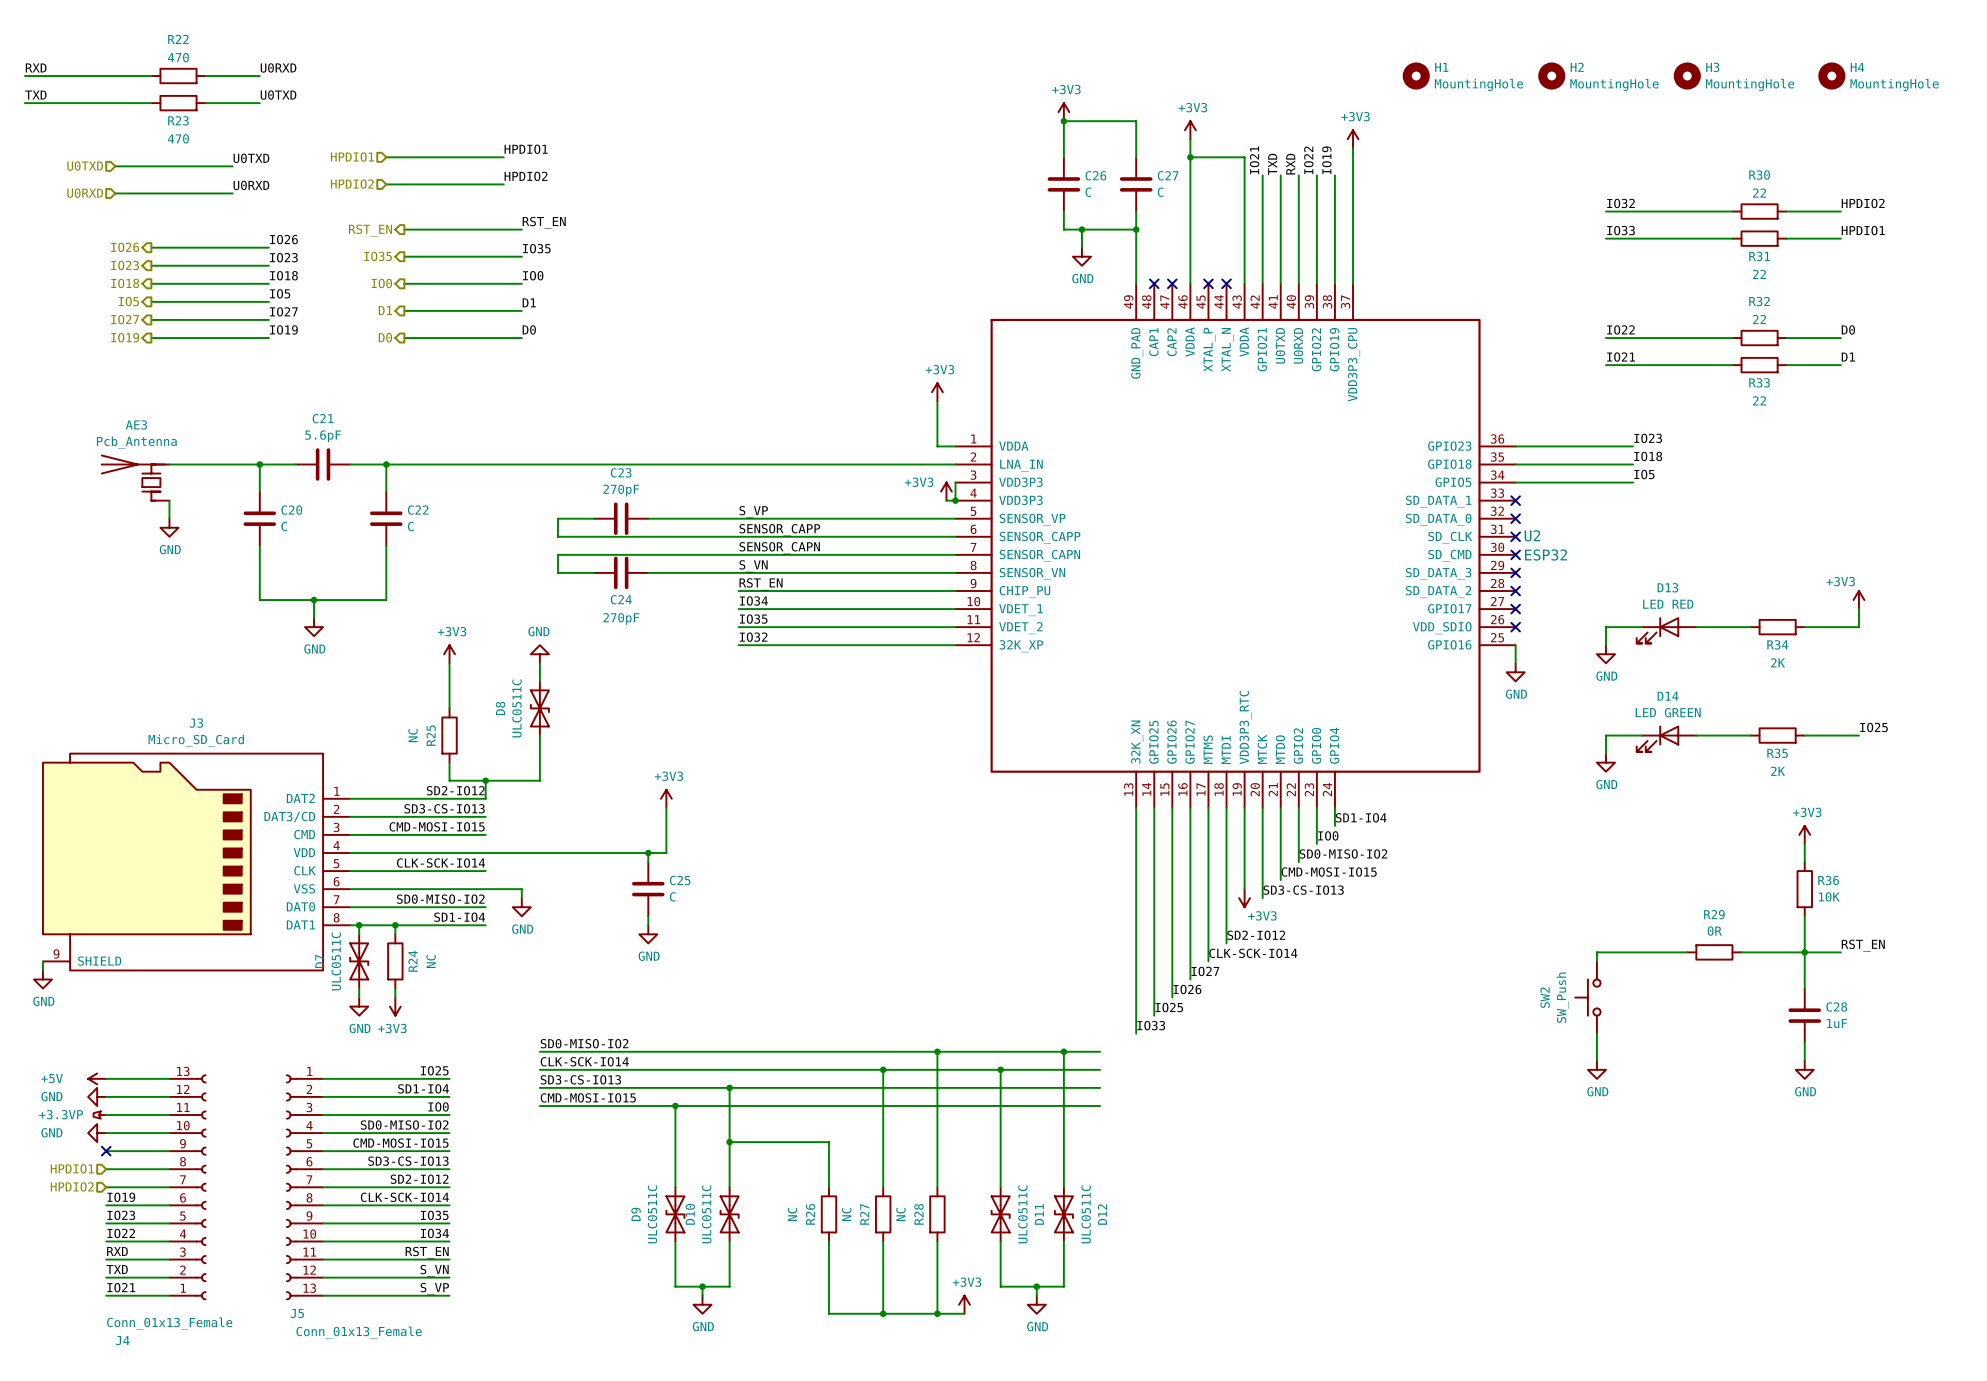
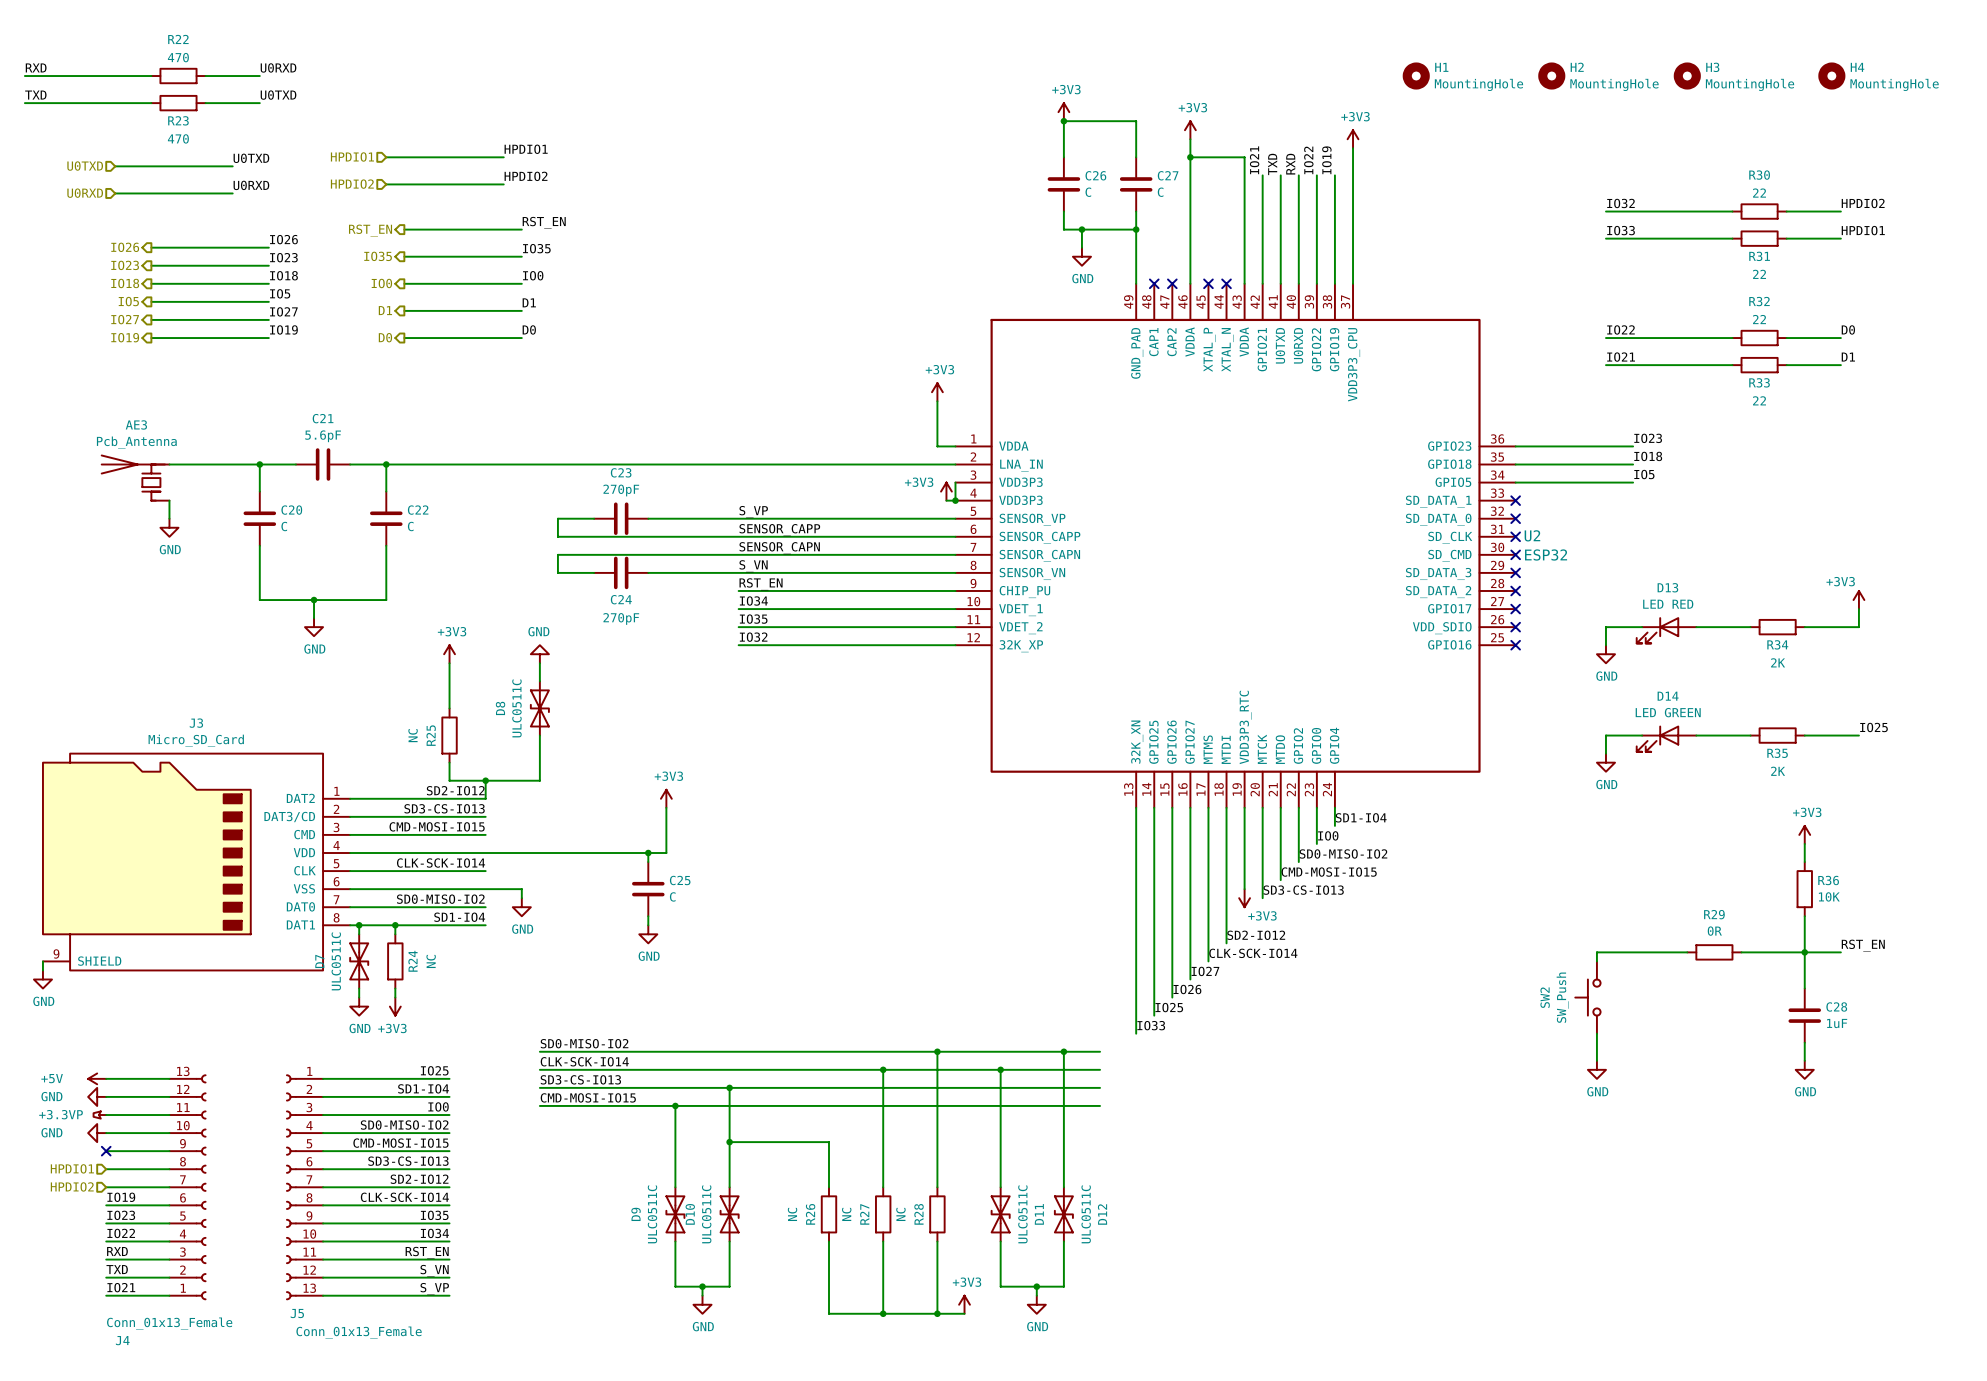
wire: (1515, 645) (1515, 663) -> none
no-connect mark: none -> (1515, 645)
power symbol: GND (1515, 672) -> none

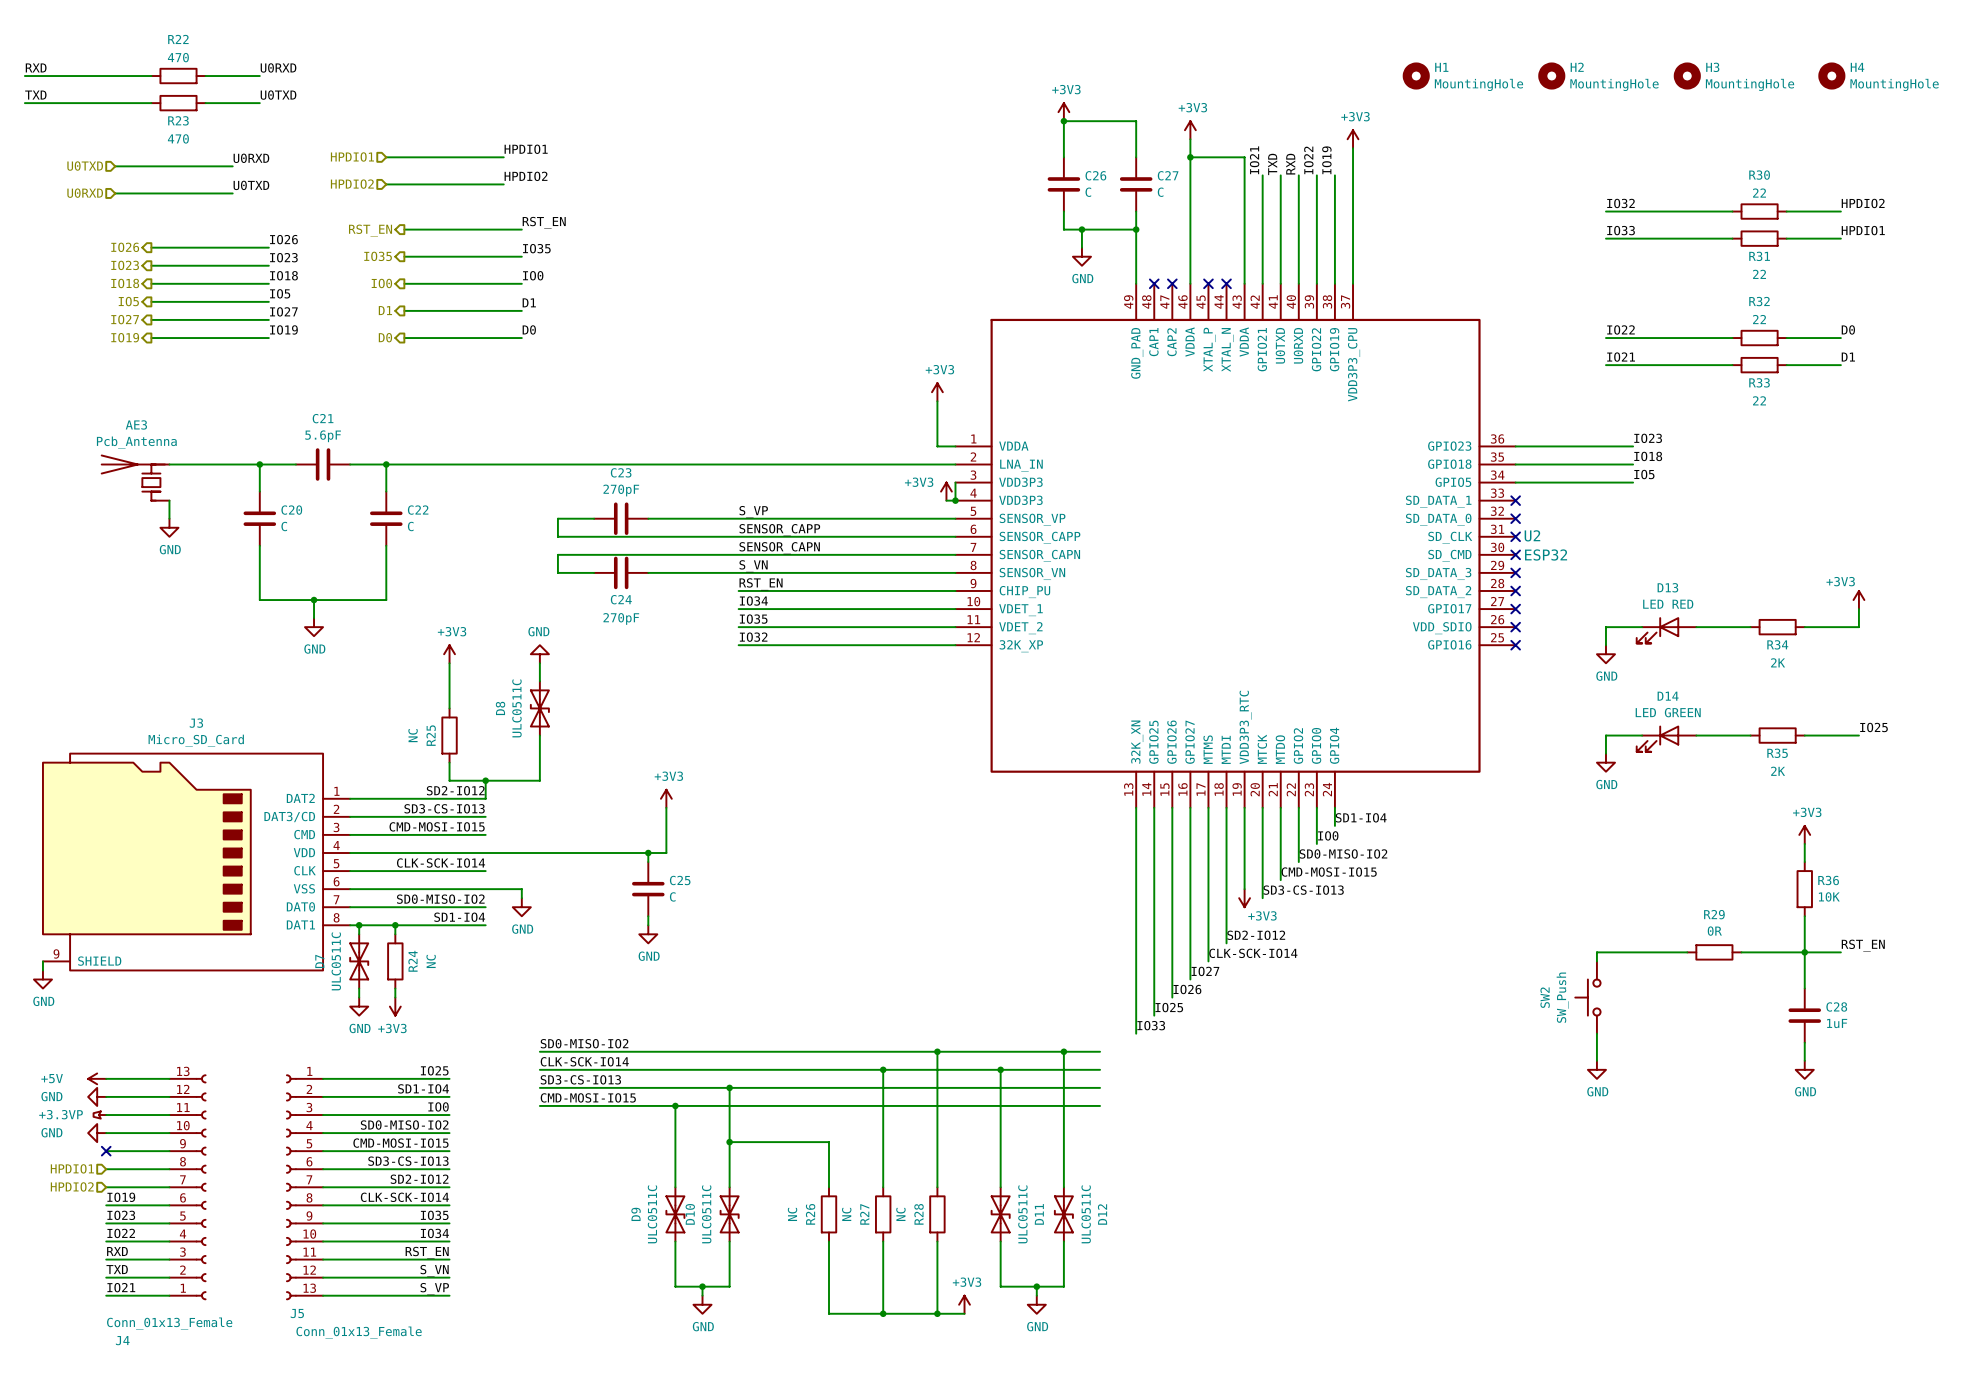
label: U0TXD (251, 158) -> U0RXD (251, 158)
label: U0RXD (251, 185) -> U0TXD (251, 185)

